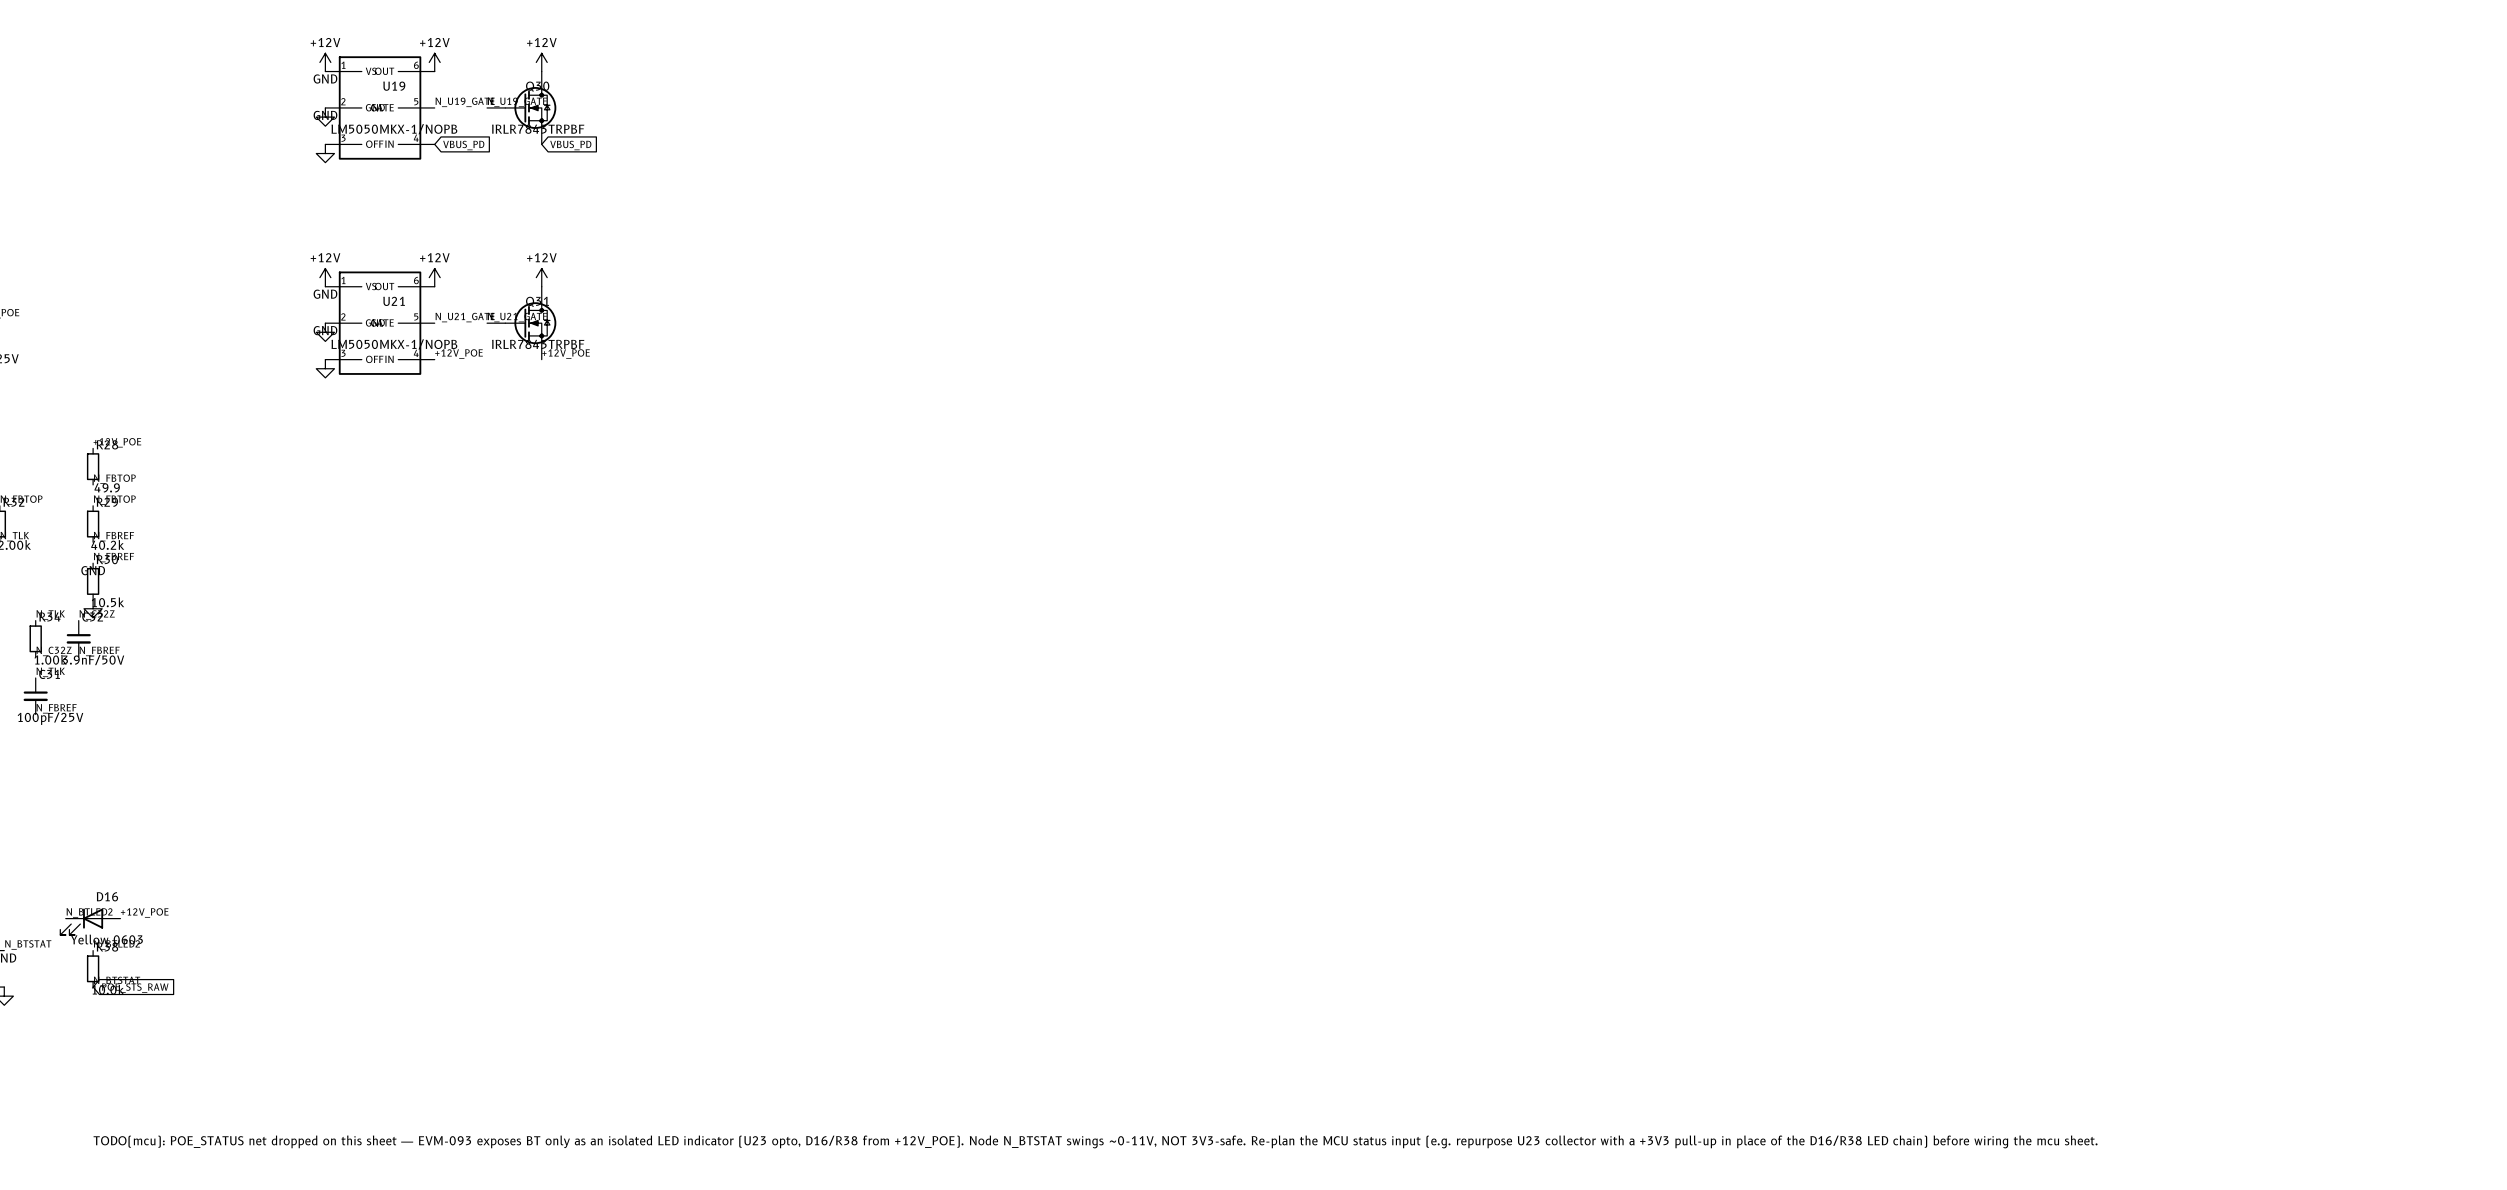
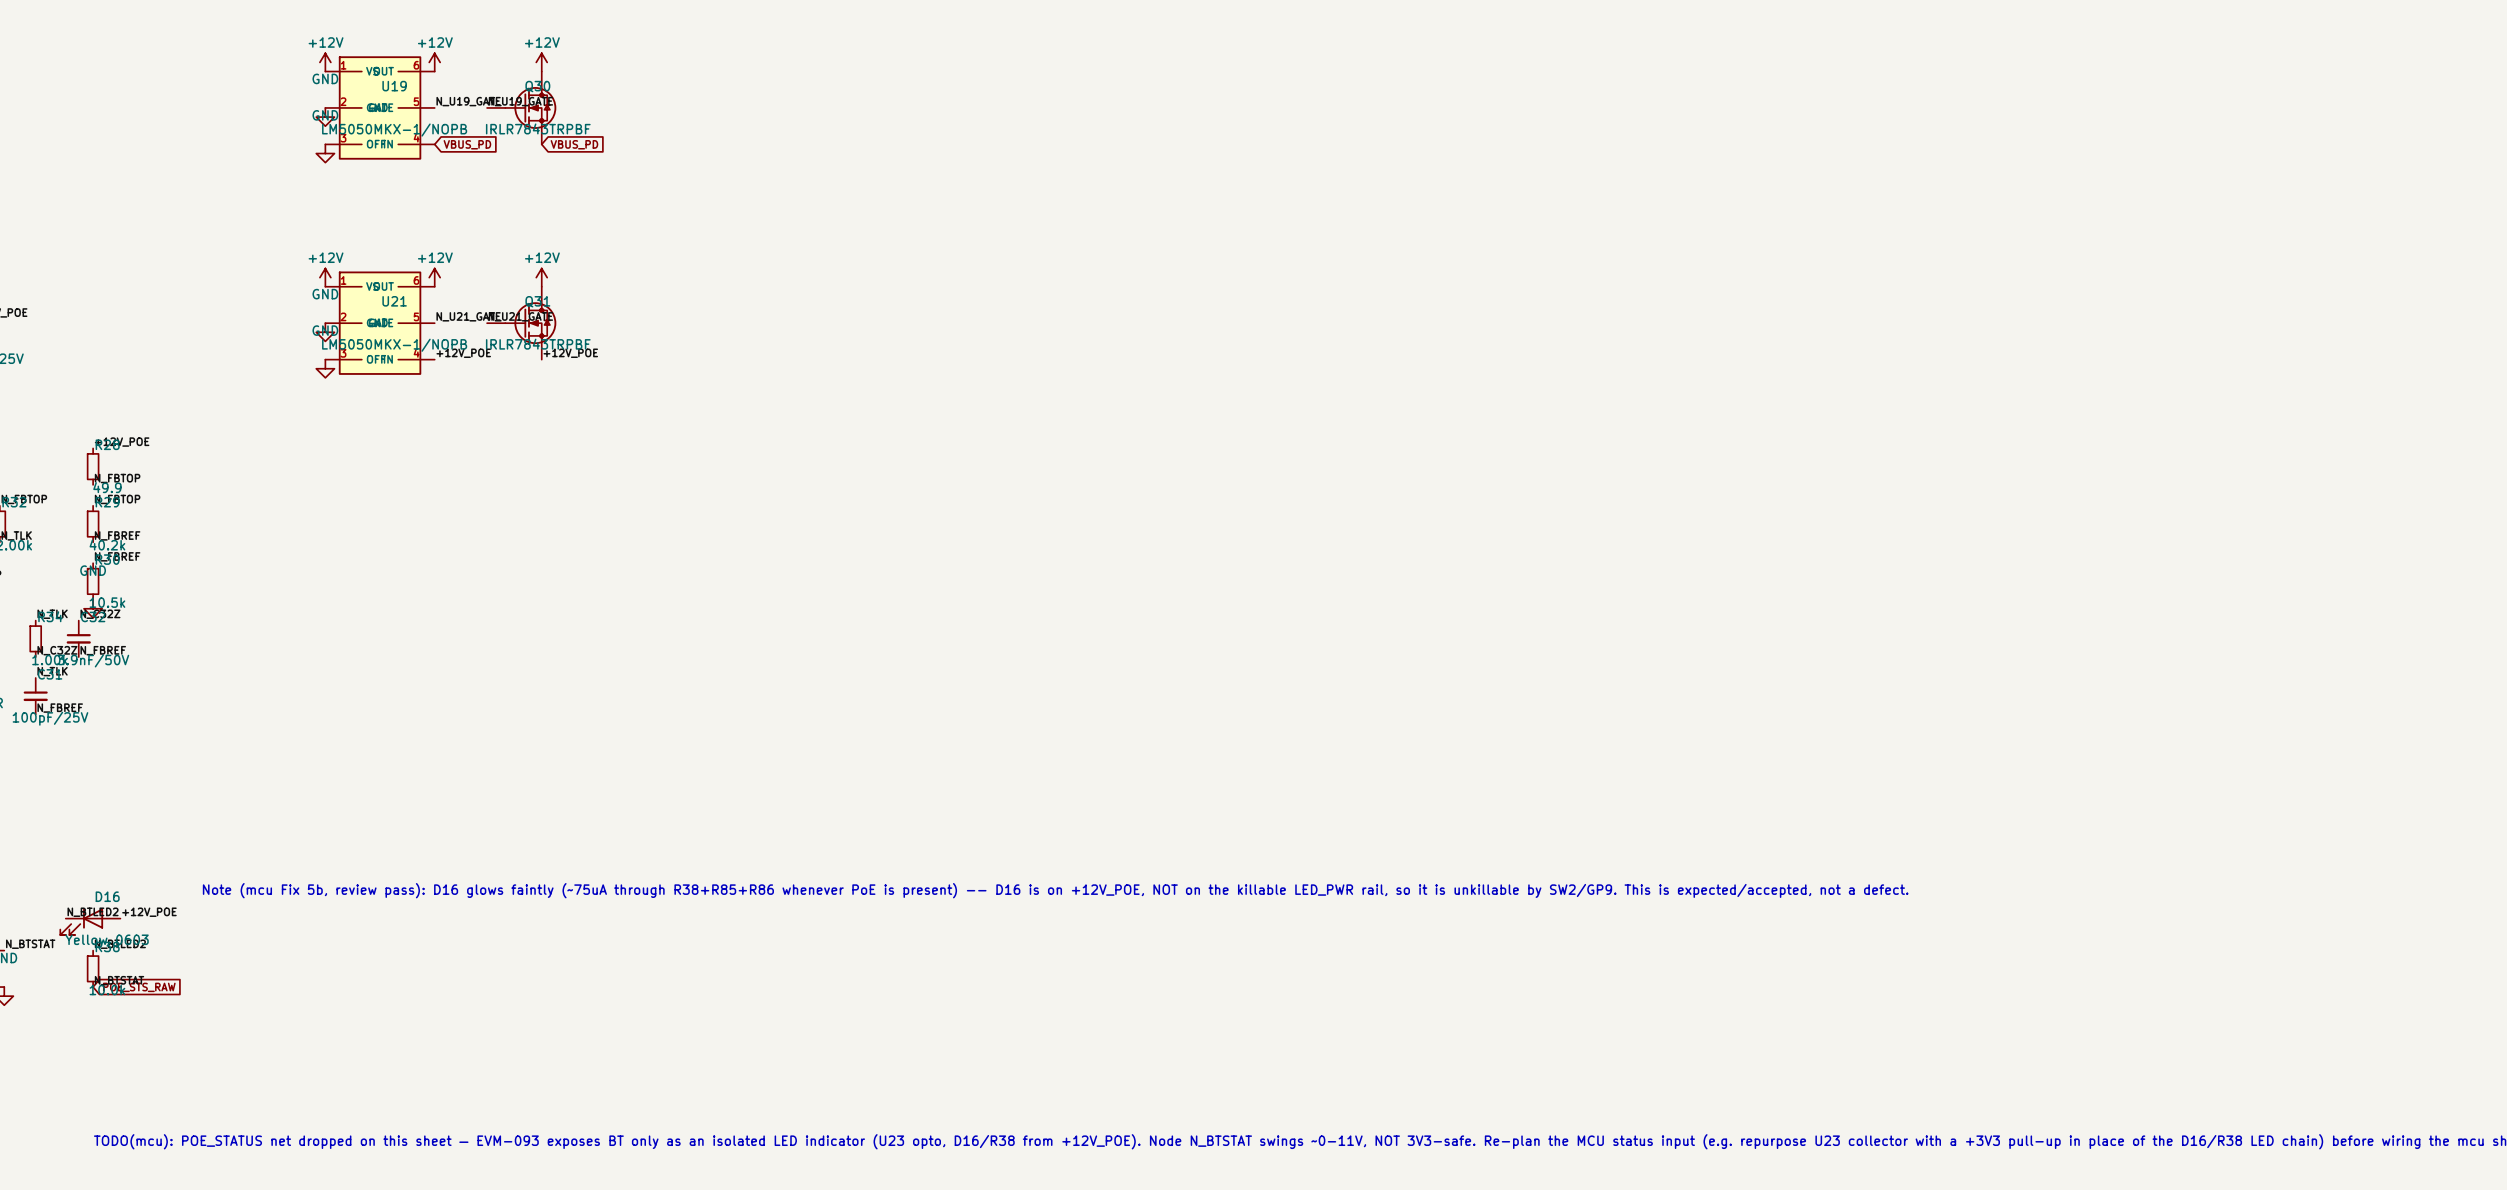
text: none -> Note (mcu Fix 5b, review pass): D16 glows faintly (~75uA through R38+R85+R86 whenever PoE is present) -- D16 is on +12V_POE, NOT on the killable LED_PWR rail, so it is unkillable by SW2/GP9. This is expected/accepted, not a defect. (1055, 890)

